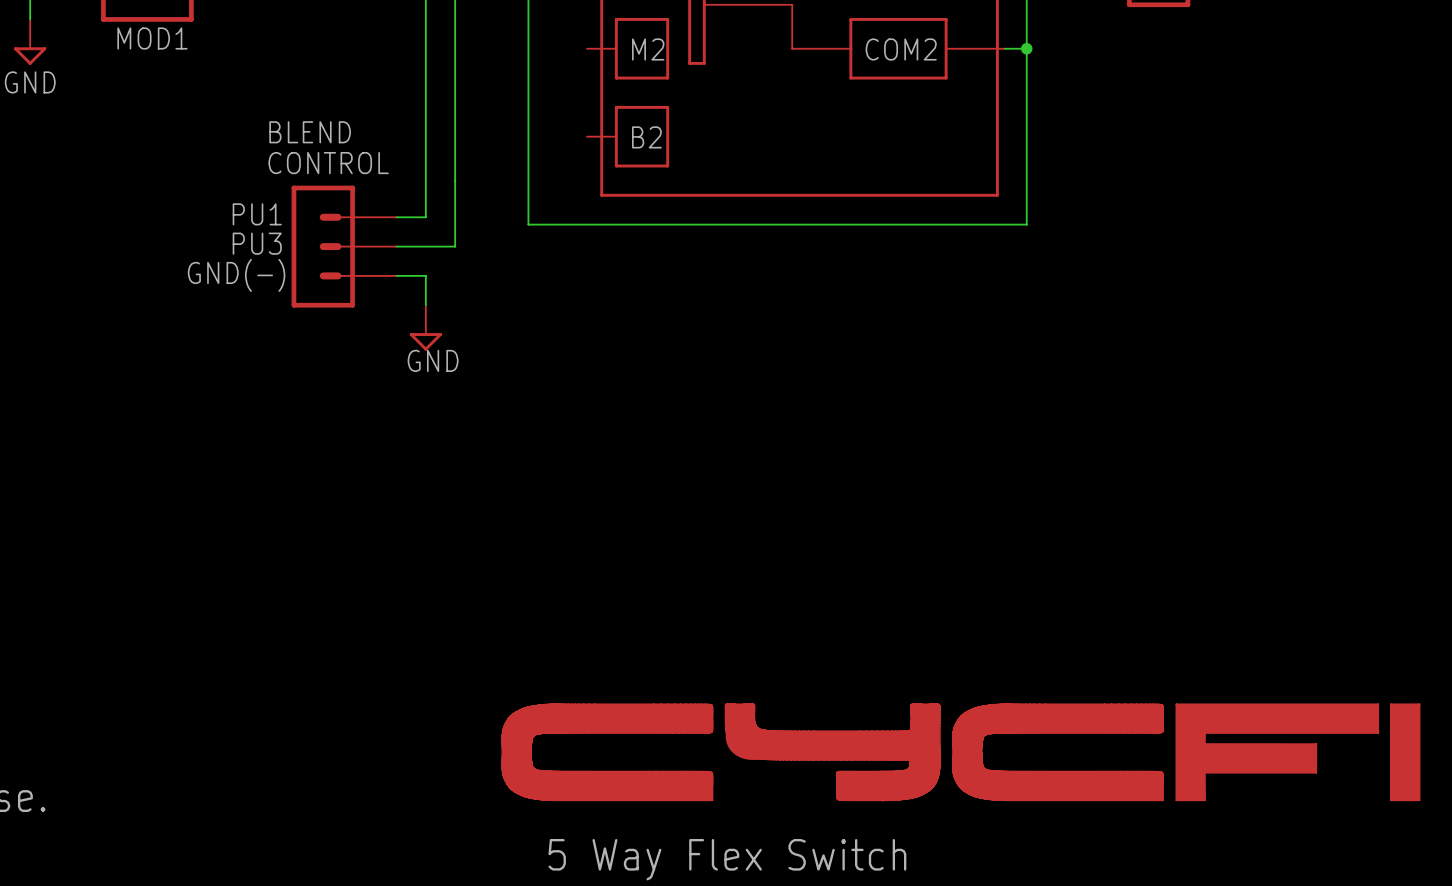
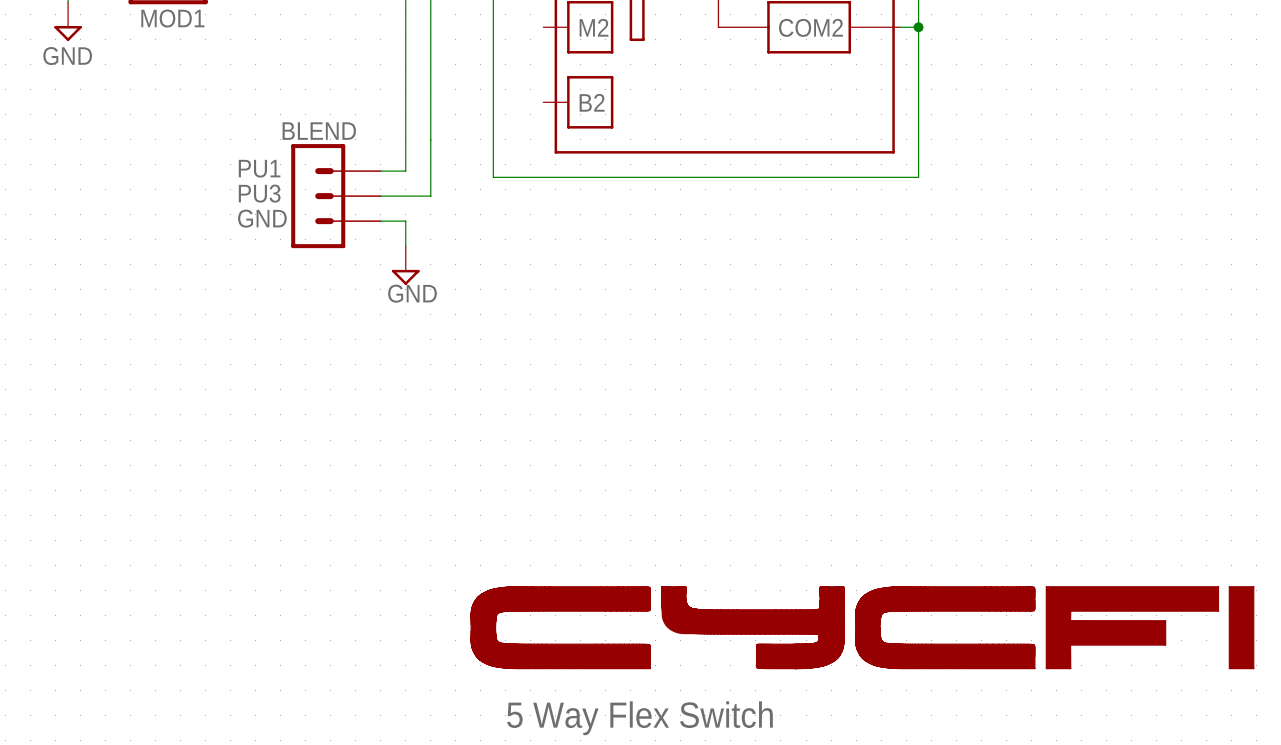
text position: BLEND (310, 132) -> BLEND (319, 131)
text: CONTROL (328, 163) -> none
text: GND(-) (236, 275) -> GND (262, 218)

